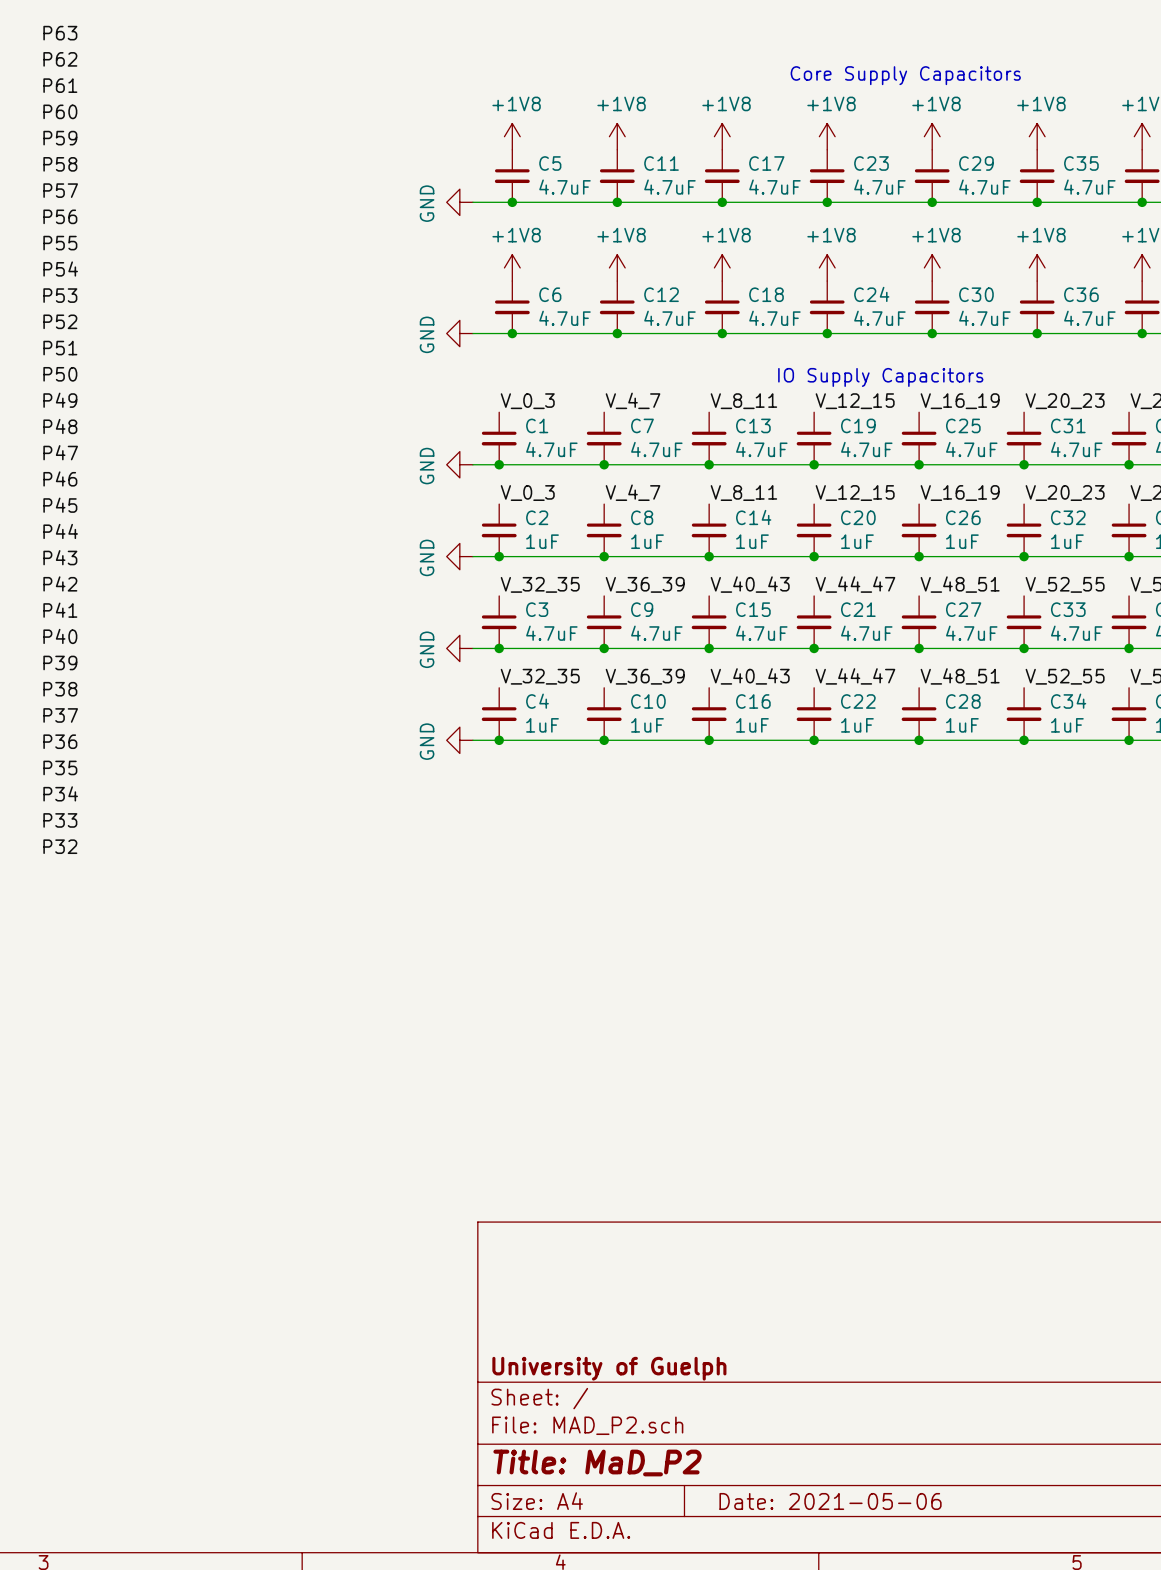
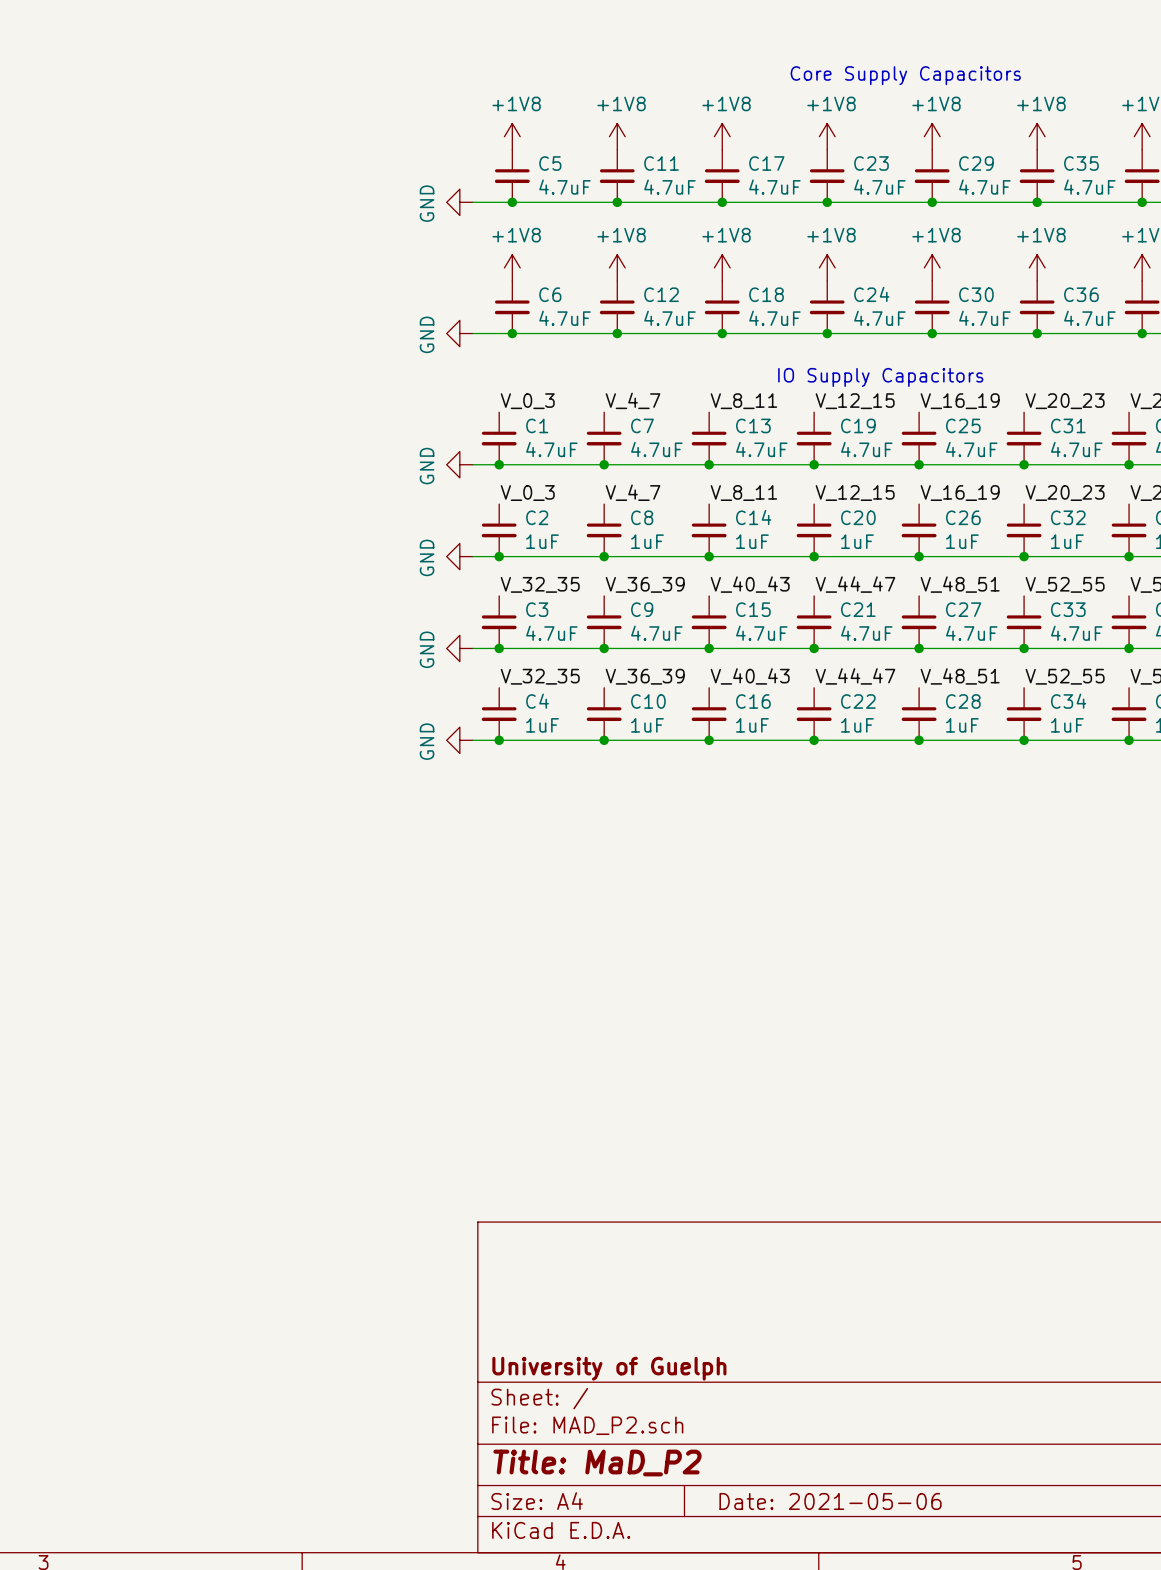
label: P63 (60, 33) -> none
label: P62 (60, 59) -> none
label: P61 (60, 85) -> none
label: P60 (60, 111) -> none
label: P59 (60, 138) -> none
label: P58 (60, 164) -> none
label: P57 (60, 190) -> none
label: P56 (60, 216) -> none
label: P55 (60, 243) -> none
label: P54 (60, 269) -> none
label: P53 (60, 295) -> none
label: P52 (60, 321) -> none
label: P51 (60, 348) -> none
label: P50 (60, 374) -> none
label: P49 (60, 400) -> none
label: P48 (60, 426) -> none
label: P47 (60, 452) -> none
label: P46 (60, 478) -> none
label: P45 (60, 505) -> none
label: P44 (60, 531) -> none
label: P43 (60, 557) -> none
label: P42 (60, 583) -> none
label: P41 (60, 610) -> none
label: P40 (60, 636) -> none
label: P39 (60, 662) -> none
label: P38 (60, 689) -> none
label: P37 (60, 715) -> none
label: P36 (60, 741) -> none
label: P35 (60, 767) -> none
label: P34 (60, 793) -> none
label: P33 (60, 820) -> none
label: P32 (60, 846) -> none

